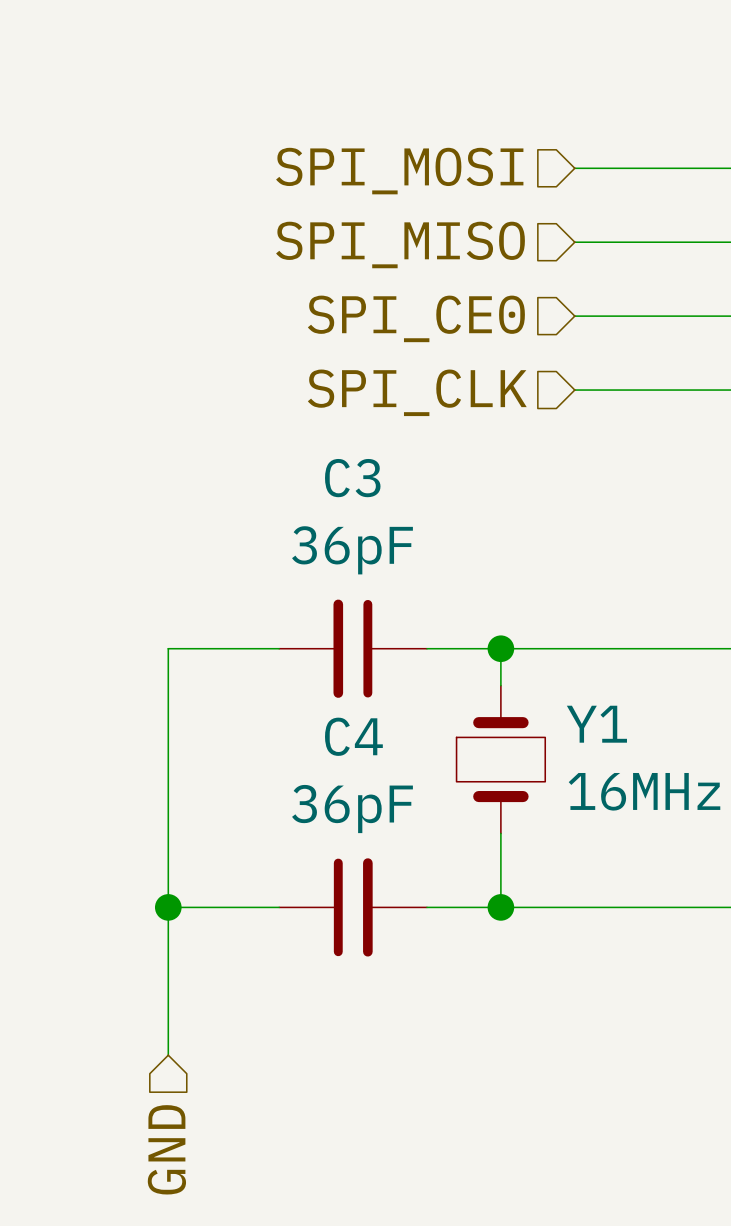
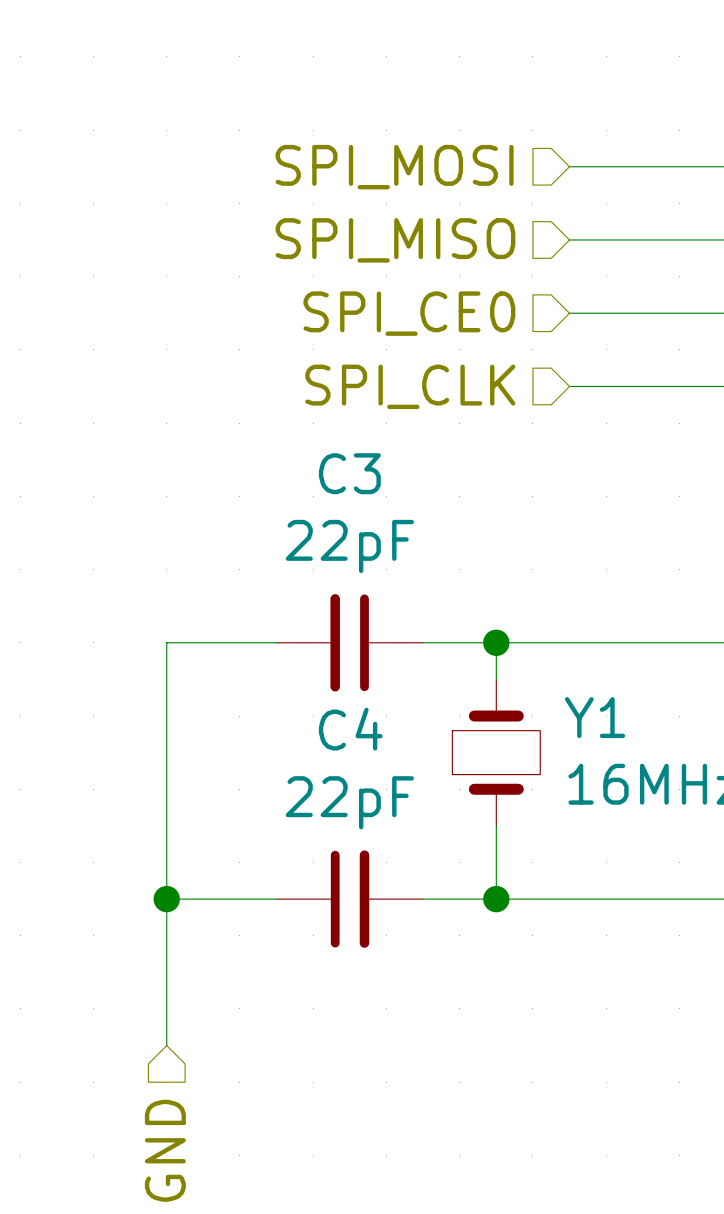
C3 value: 36pF (352, 550) -> 22pF (349, 546)
C4 value: 36pF (352, 809) -> 22pF (349, 802)

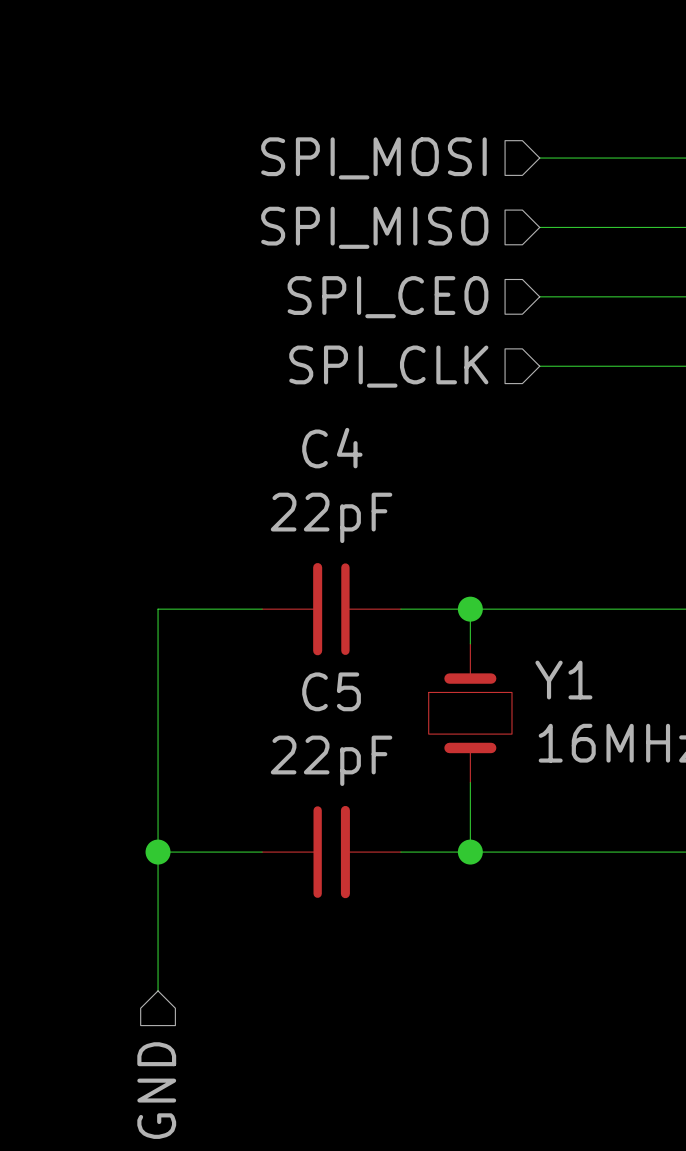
C3 name: C3 (349, 473) -> C4 (332, 448)
C4 name: C4 (350, 729) -> C5 (331, 691)

